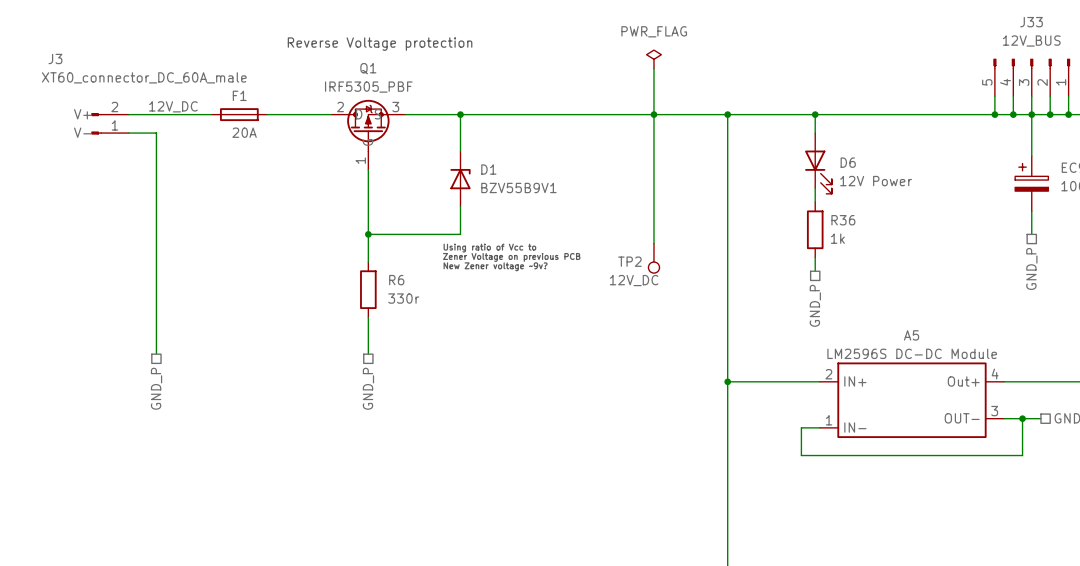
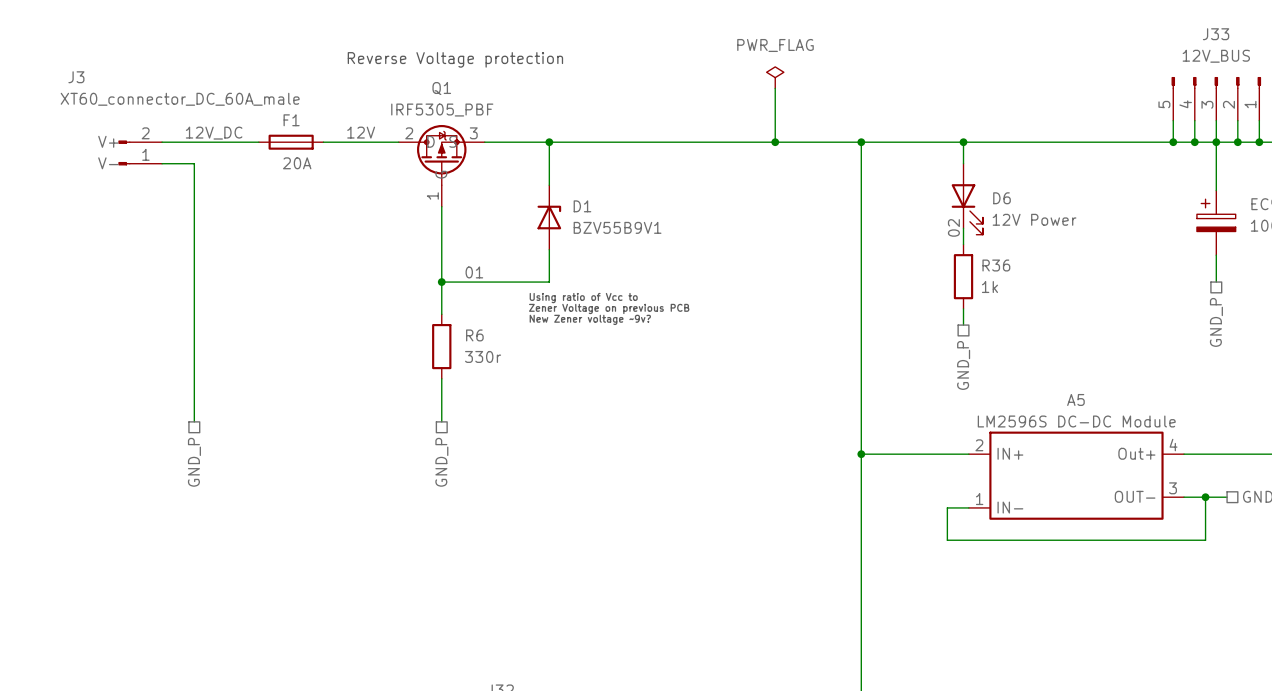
label: none -> 12V (361, 132)
wire: (653, 114) (653, 243) -> none
label: none -> 02 (953, 227)
label: none -> 01 (474, 272)
TP2: 12V_DC (653, 258) -> none

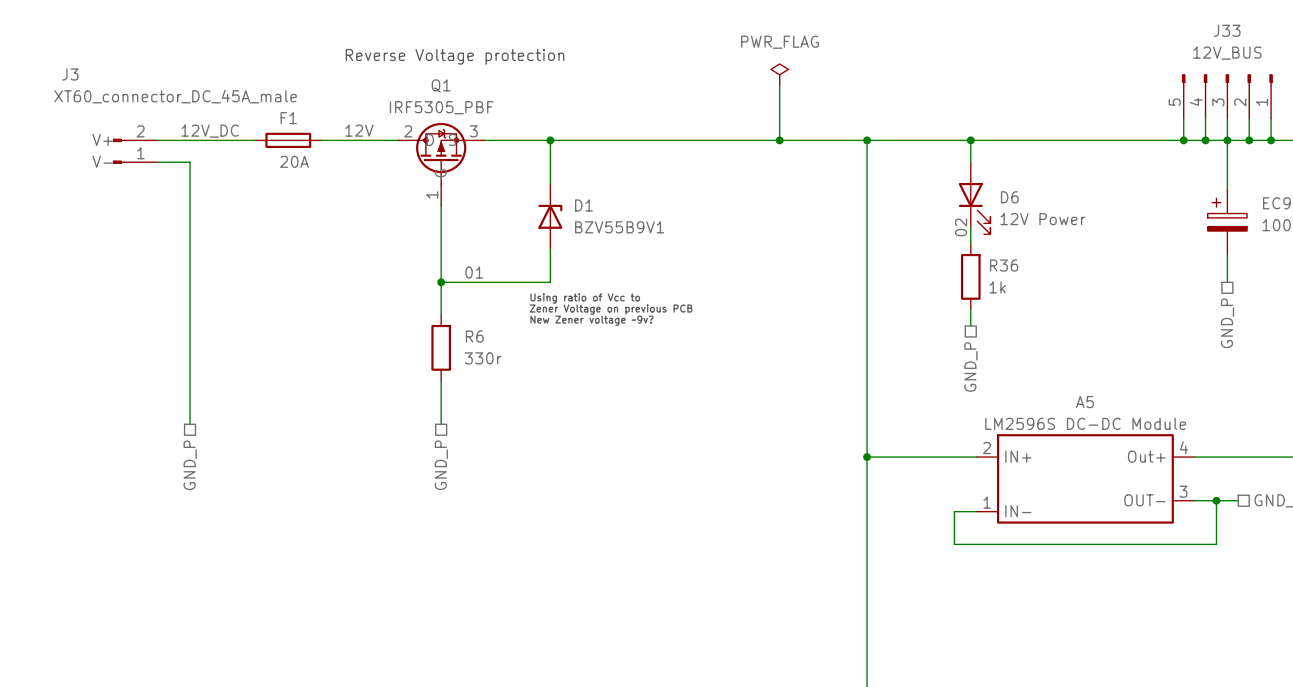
J3 value: XT60_connector_DC_60A_male (180, 99) -> XT60_connector_DC_45A_male (175, 96)

